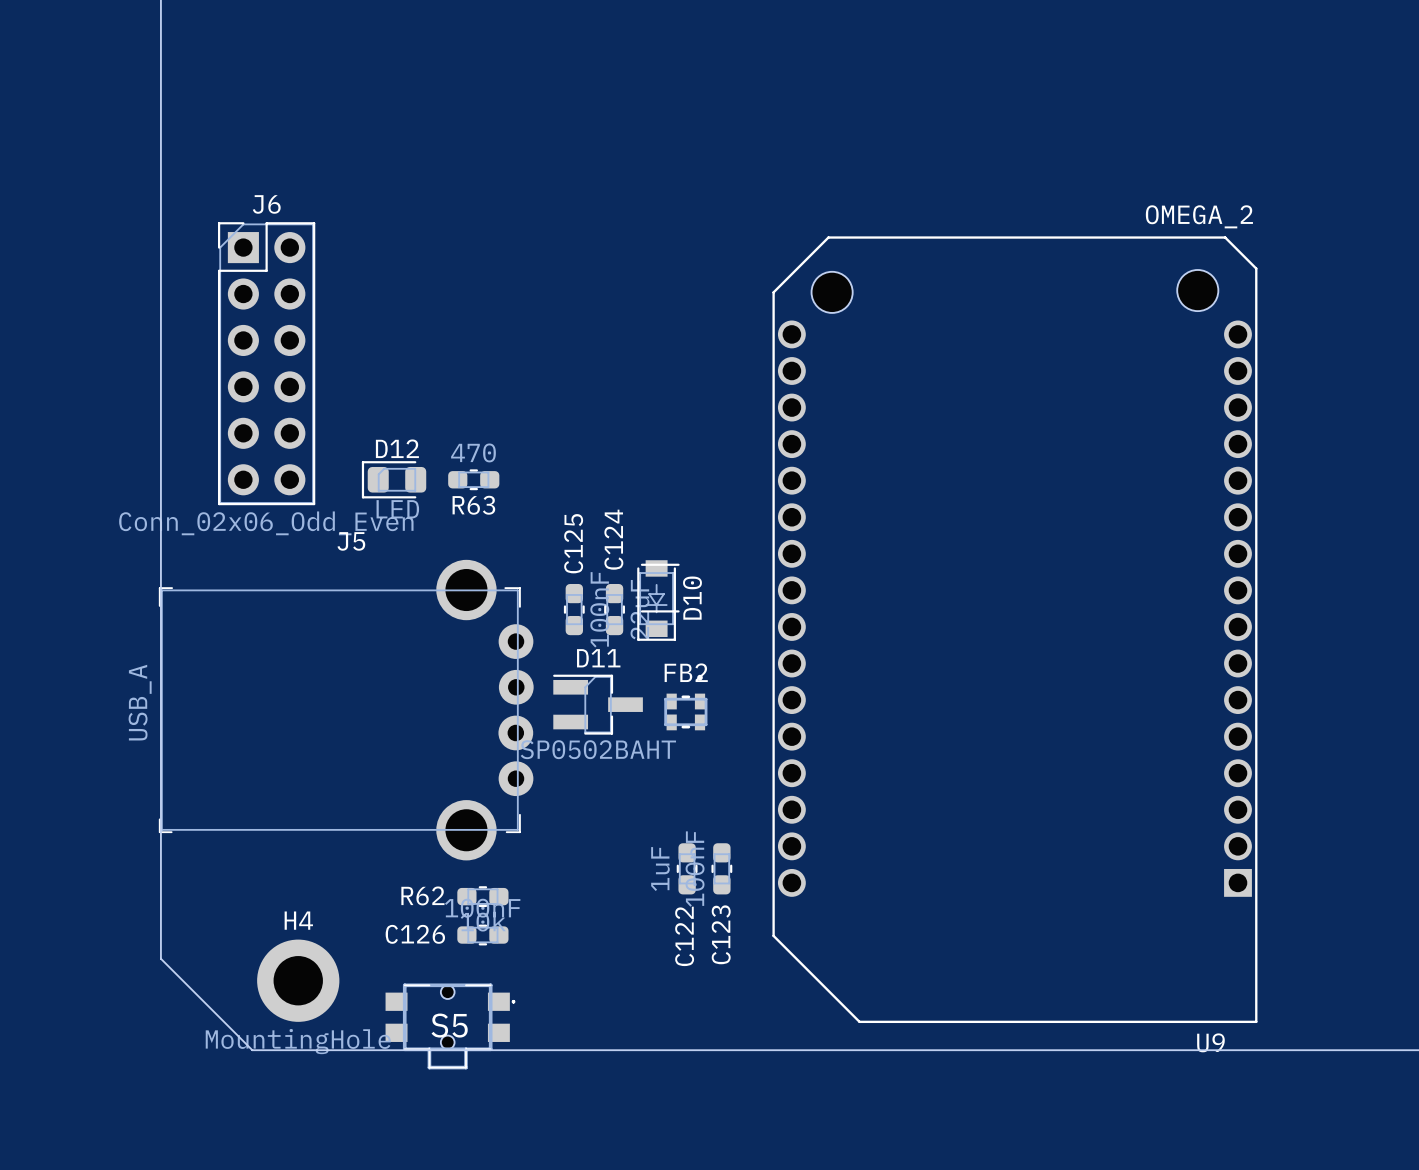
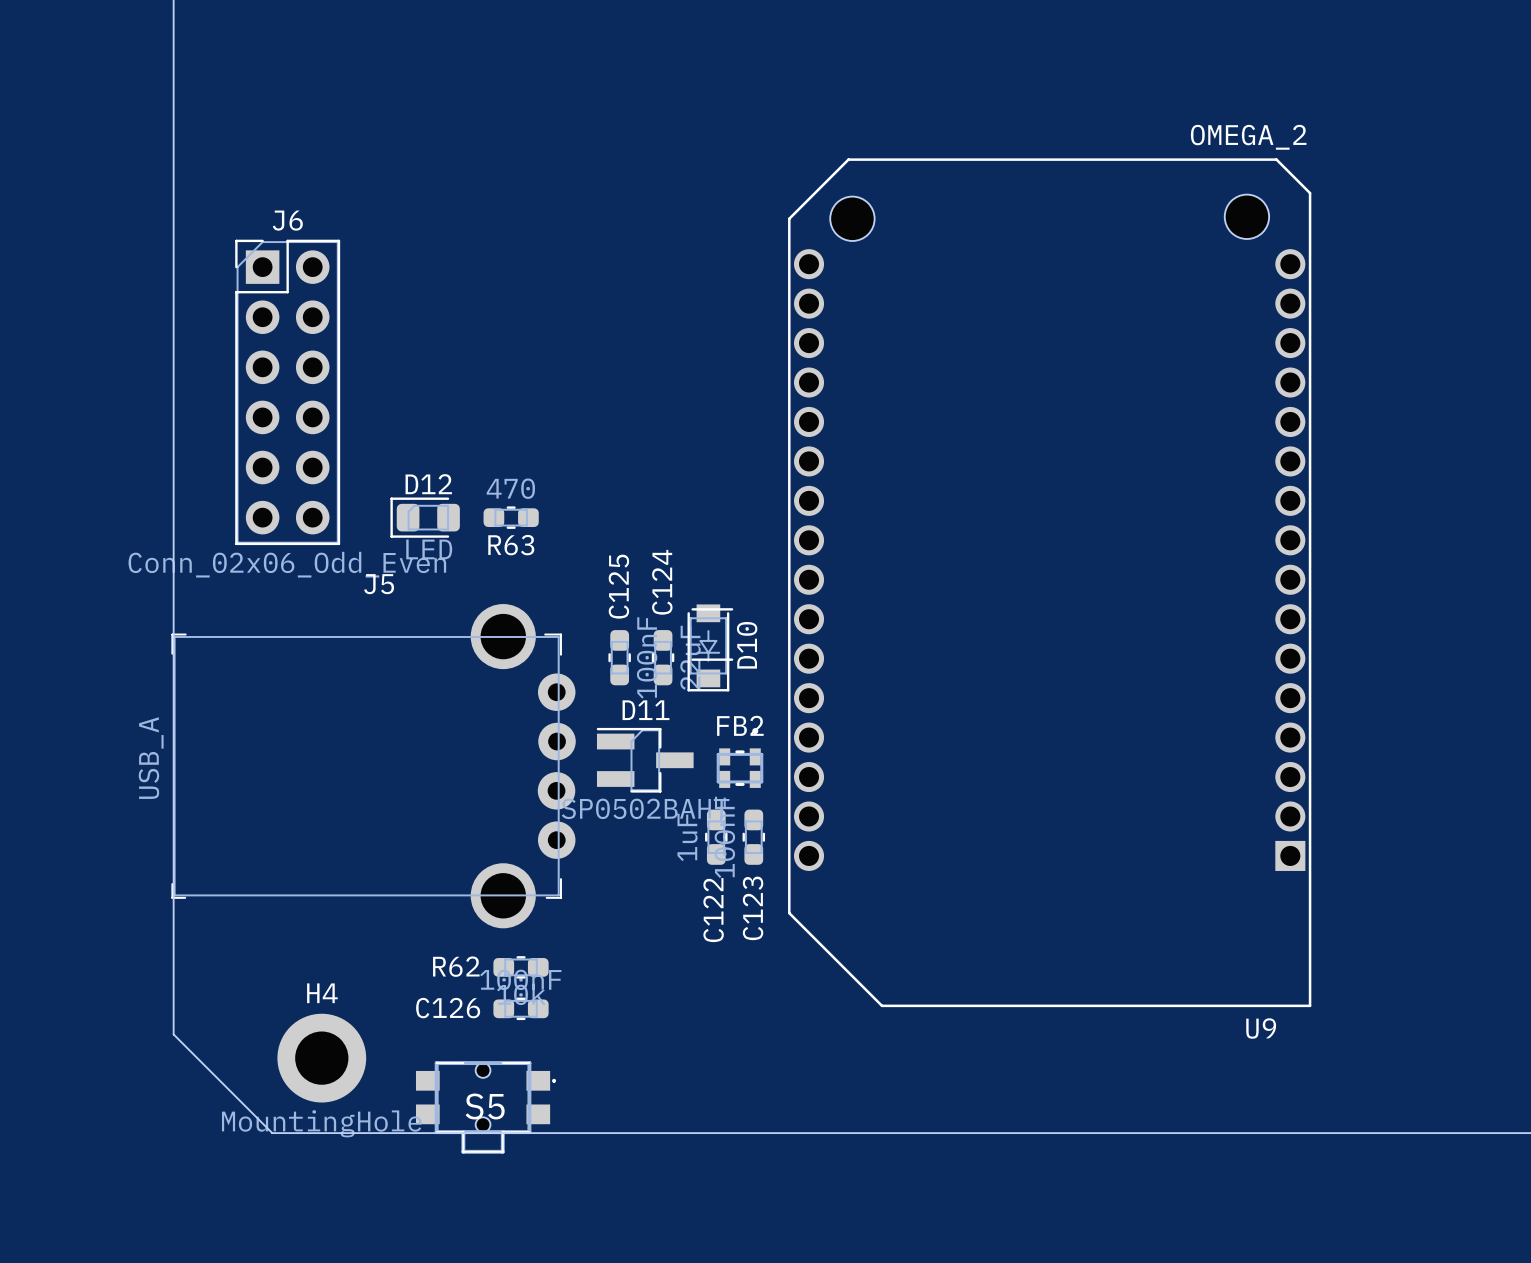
U9 position: (1014, 629) -> (1049, 582)
C122 position: (687, 868) -> (716, 837)
C123 position: (721, 868) -> (753, 837)

